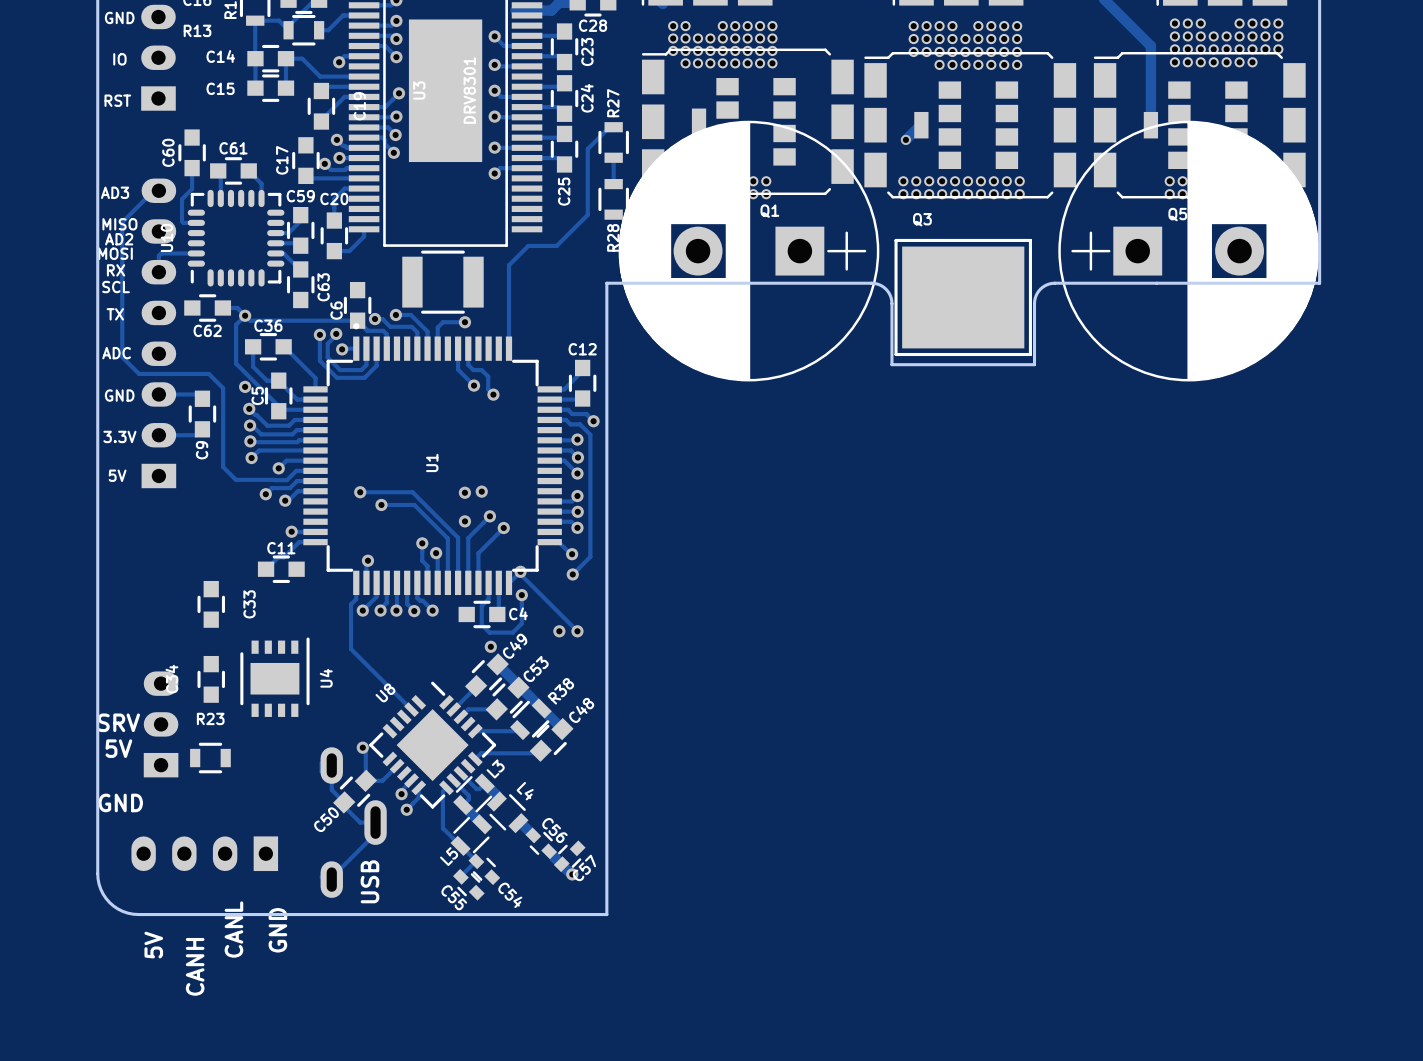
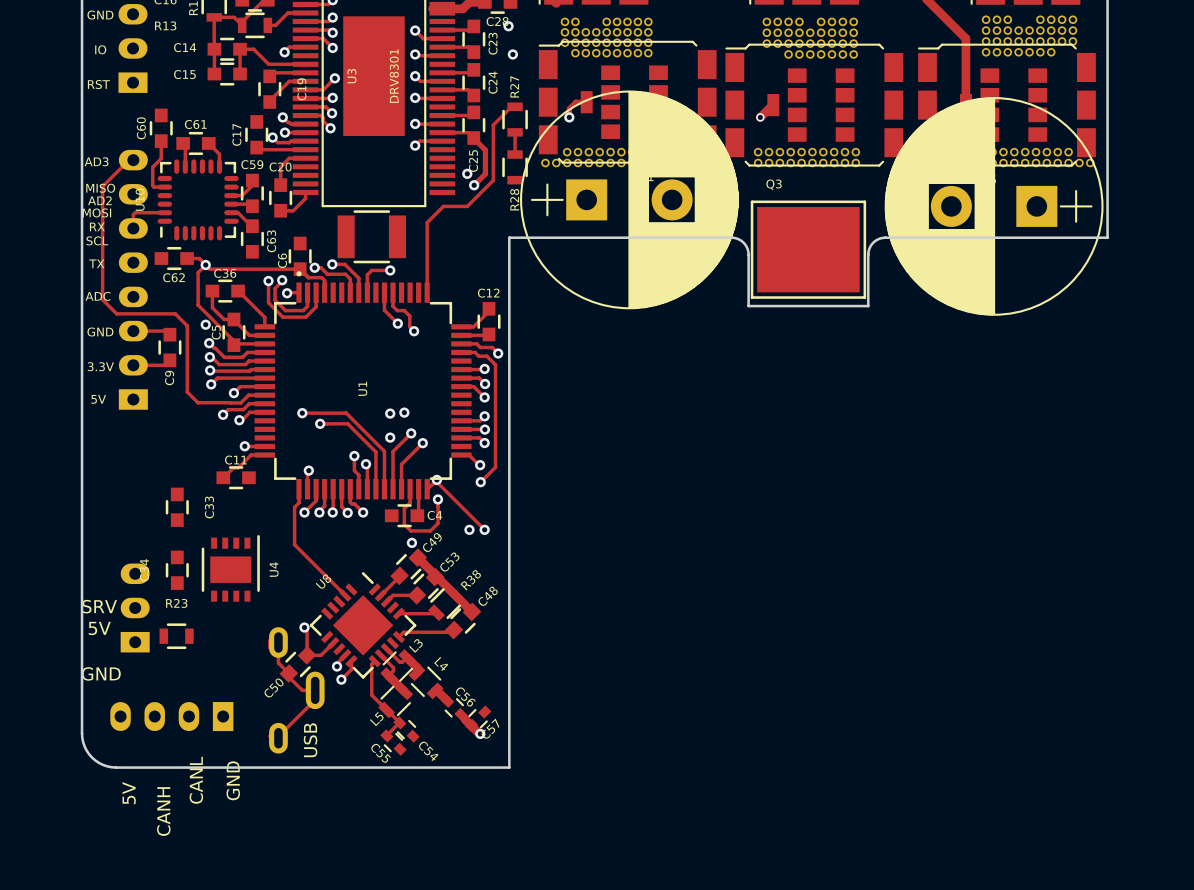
via: none -> (508, 26)
via: none -> (512, 54)
track: none -> (586, 102) (575, 102) (569, 108) (569, 117)
via: none -> (569, 117)
track: none -> (473, 138) (485, 150) (485, 173) (474, 185)
via: none -> (467, 173)
via: none -> (474, 185)
part rotation: 0° (748, 251) -> 180° (629, 199)
part rotation: 0° (1188, 251) -> 180° (994, 206)

